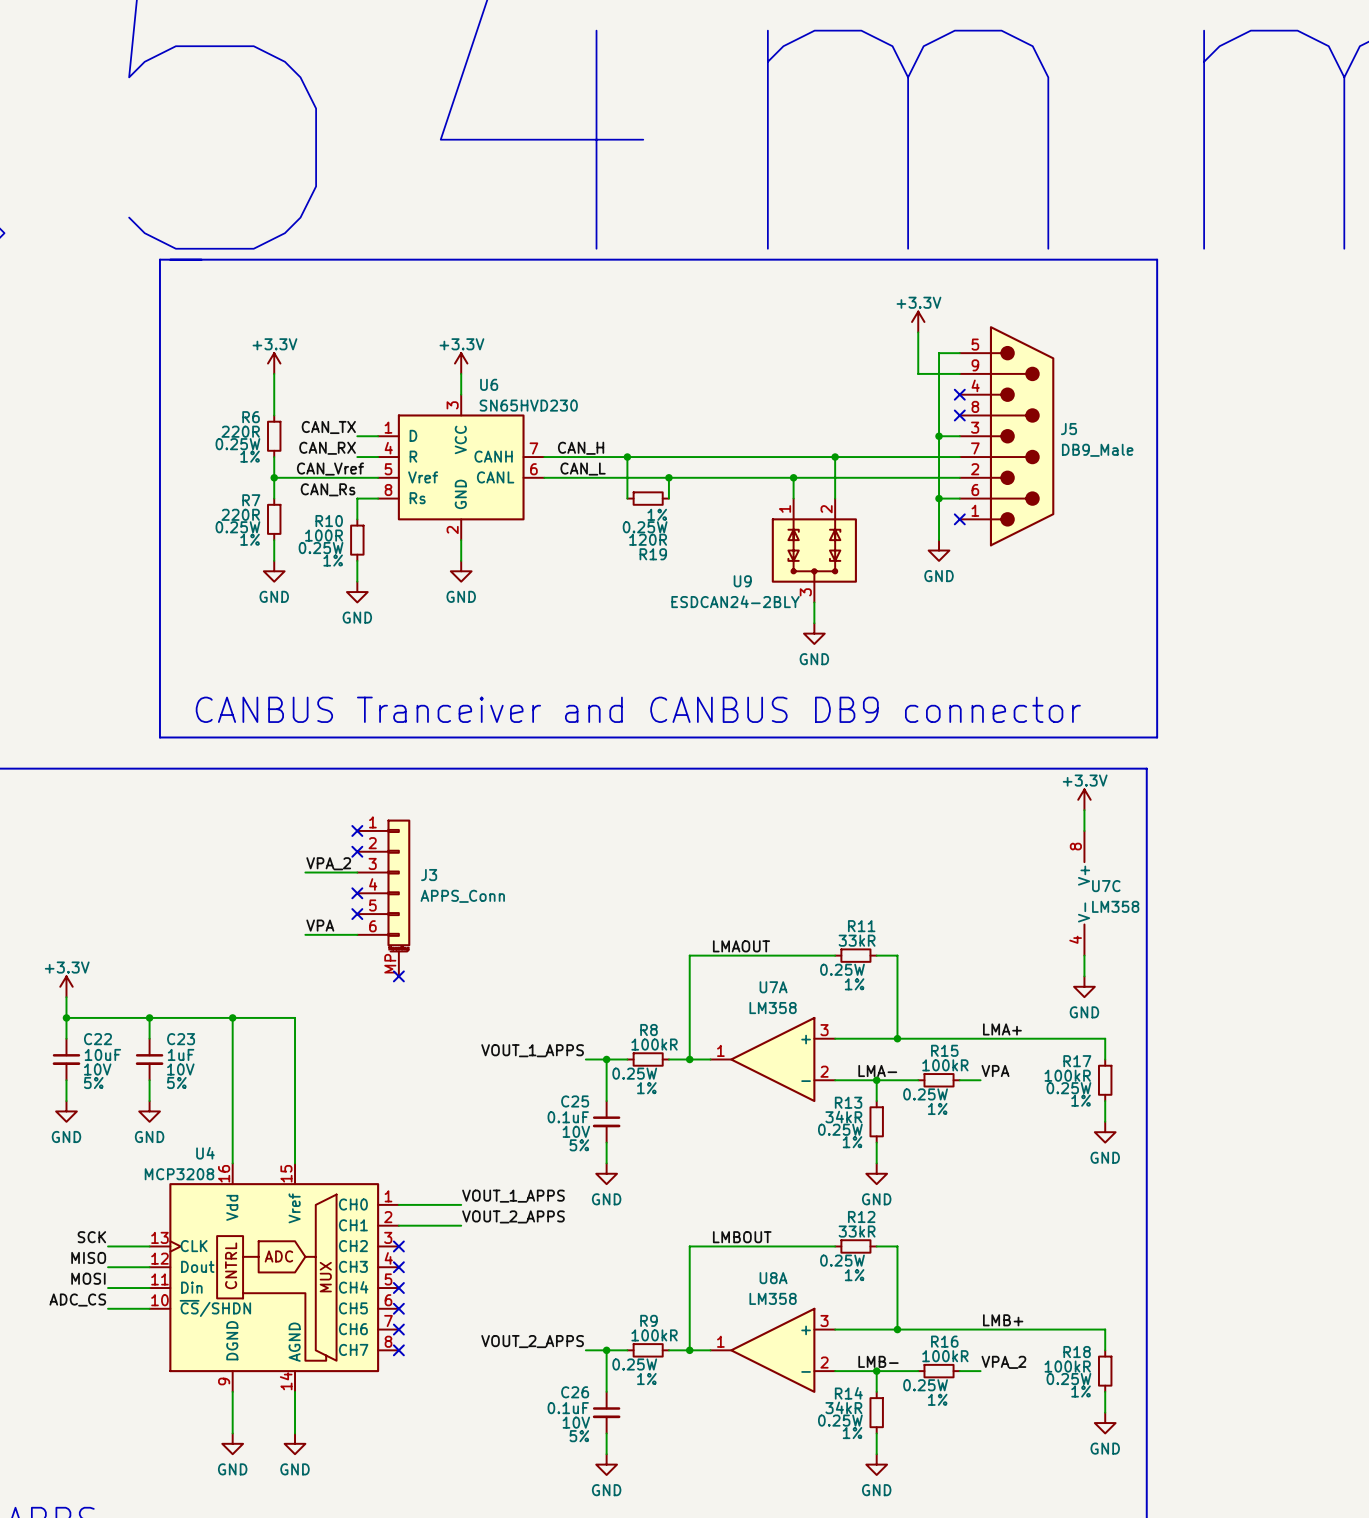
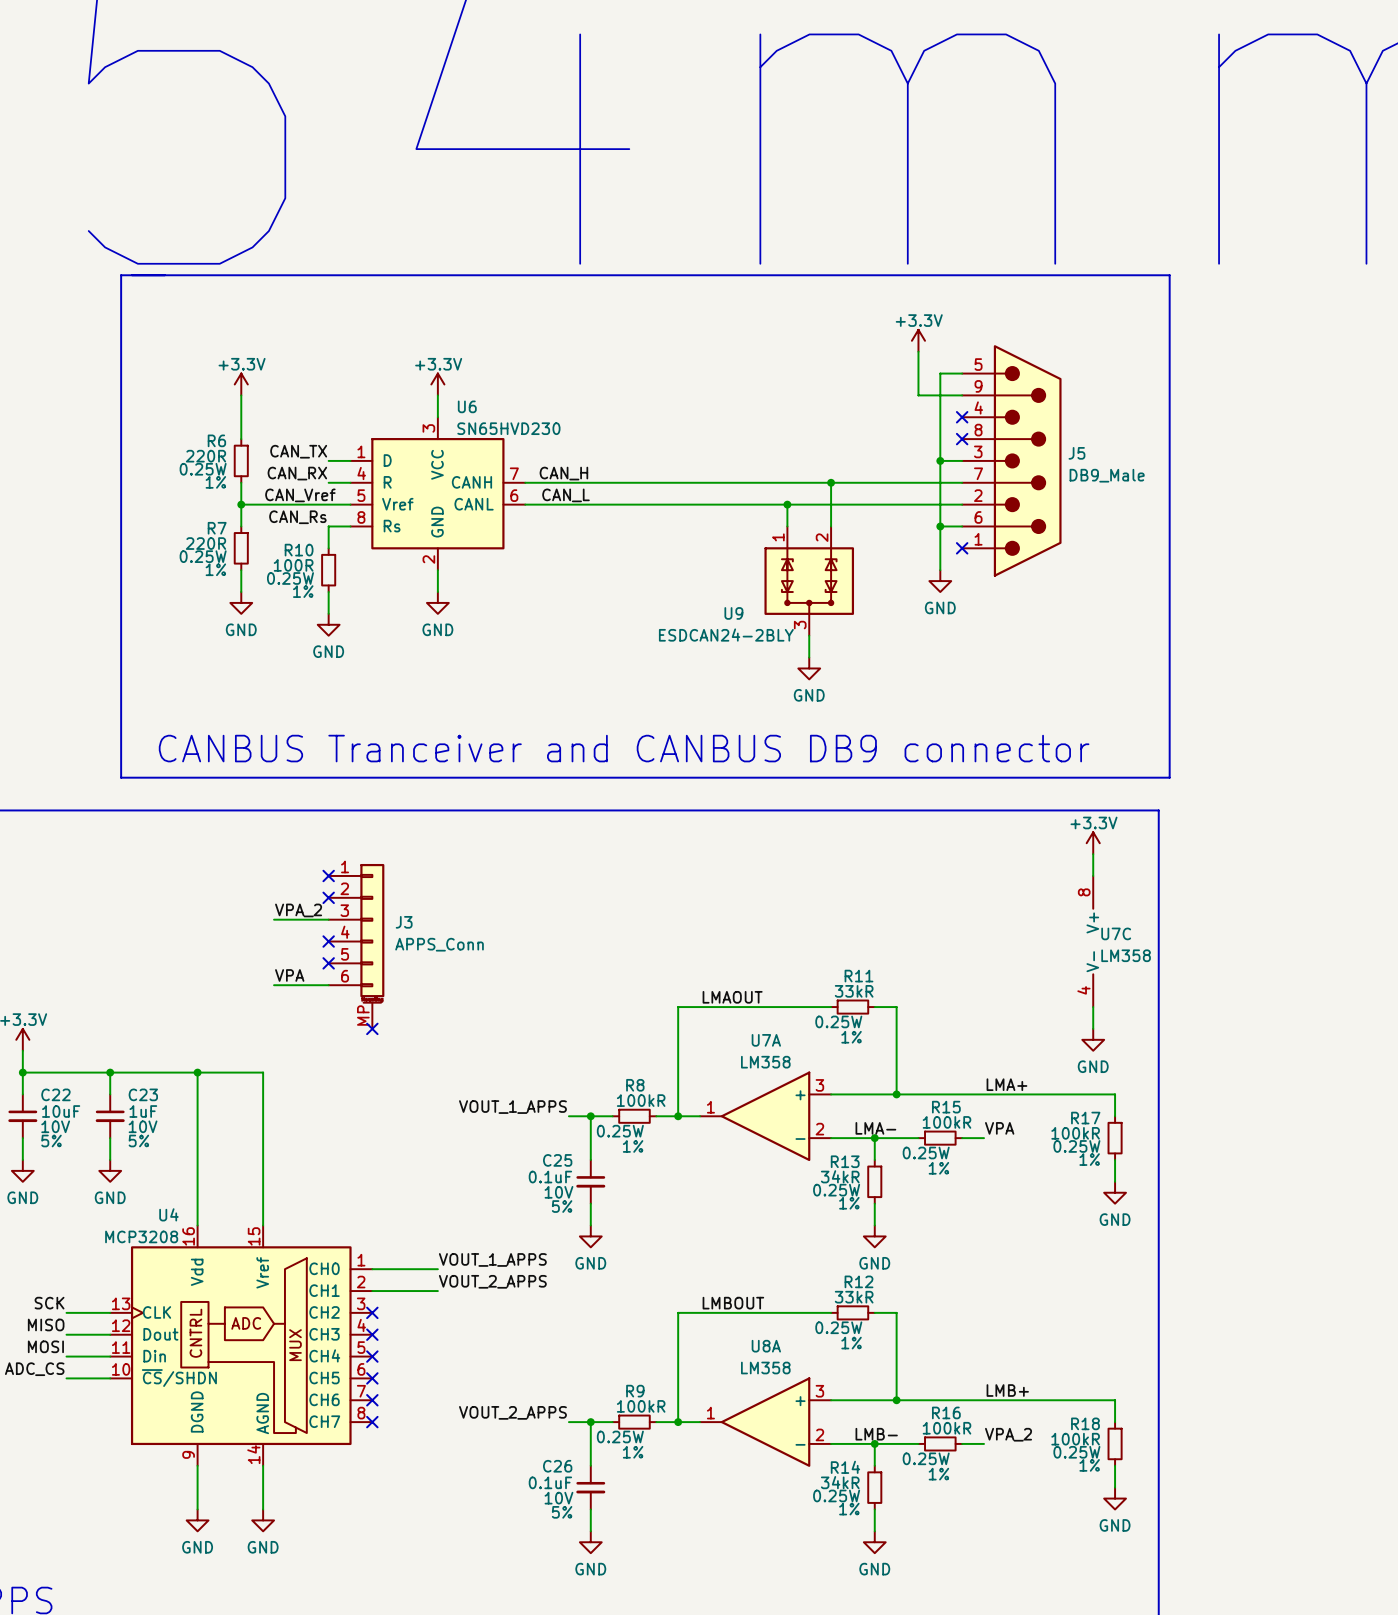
wire: (627, 457) (627, 498) -> none
junction: (627, 457) -> none
wire: (668, 477) (668, 498) -> none
junction: (668, 477) -> none
R19: 120R (648, 498) -> none

